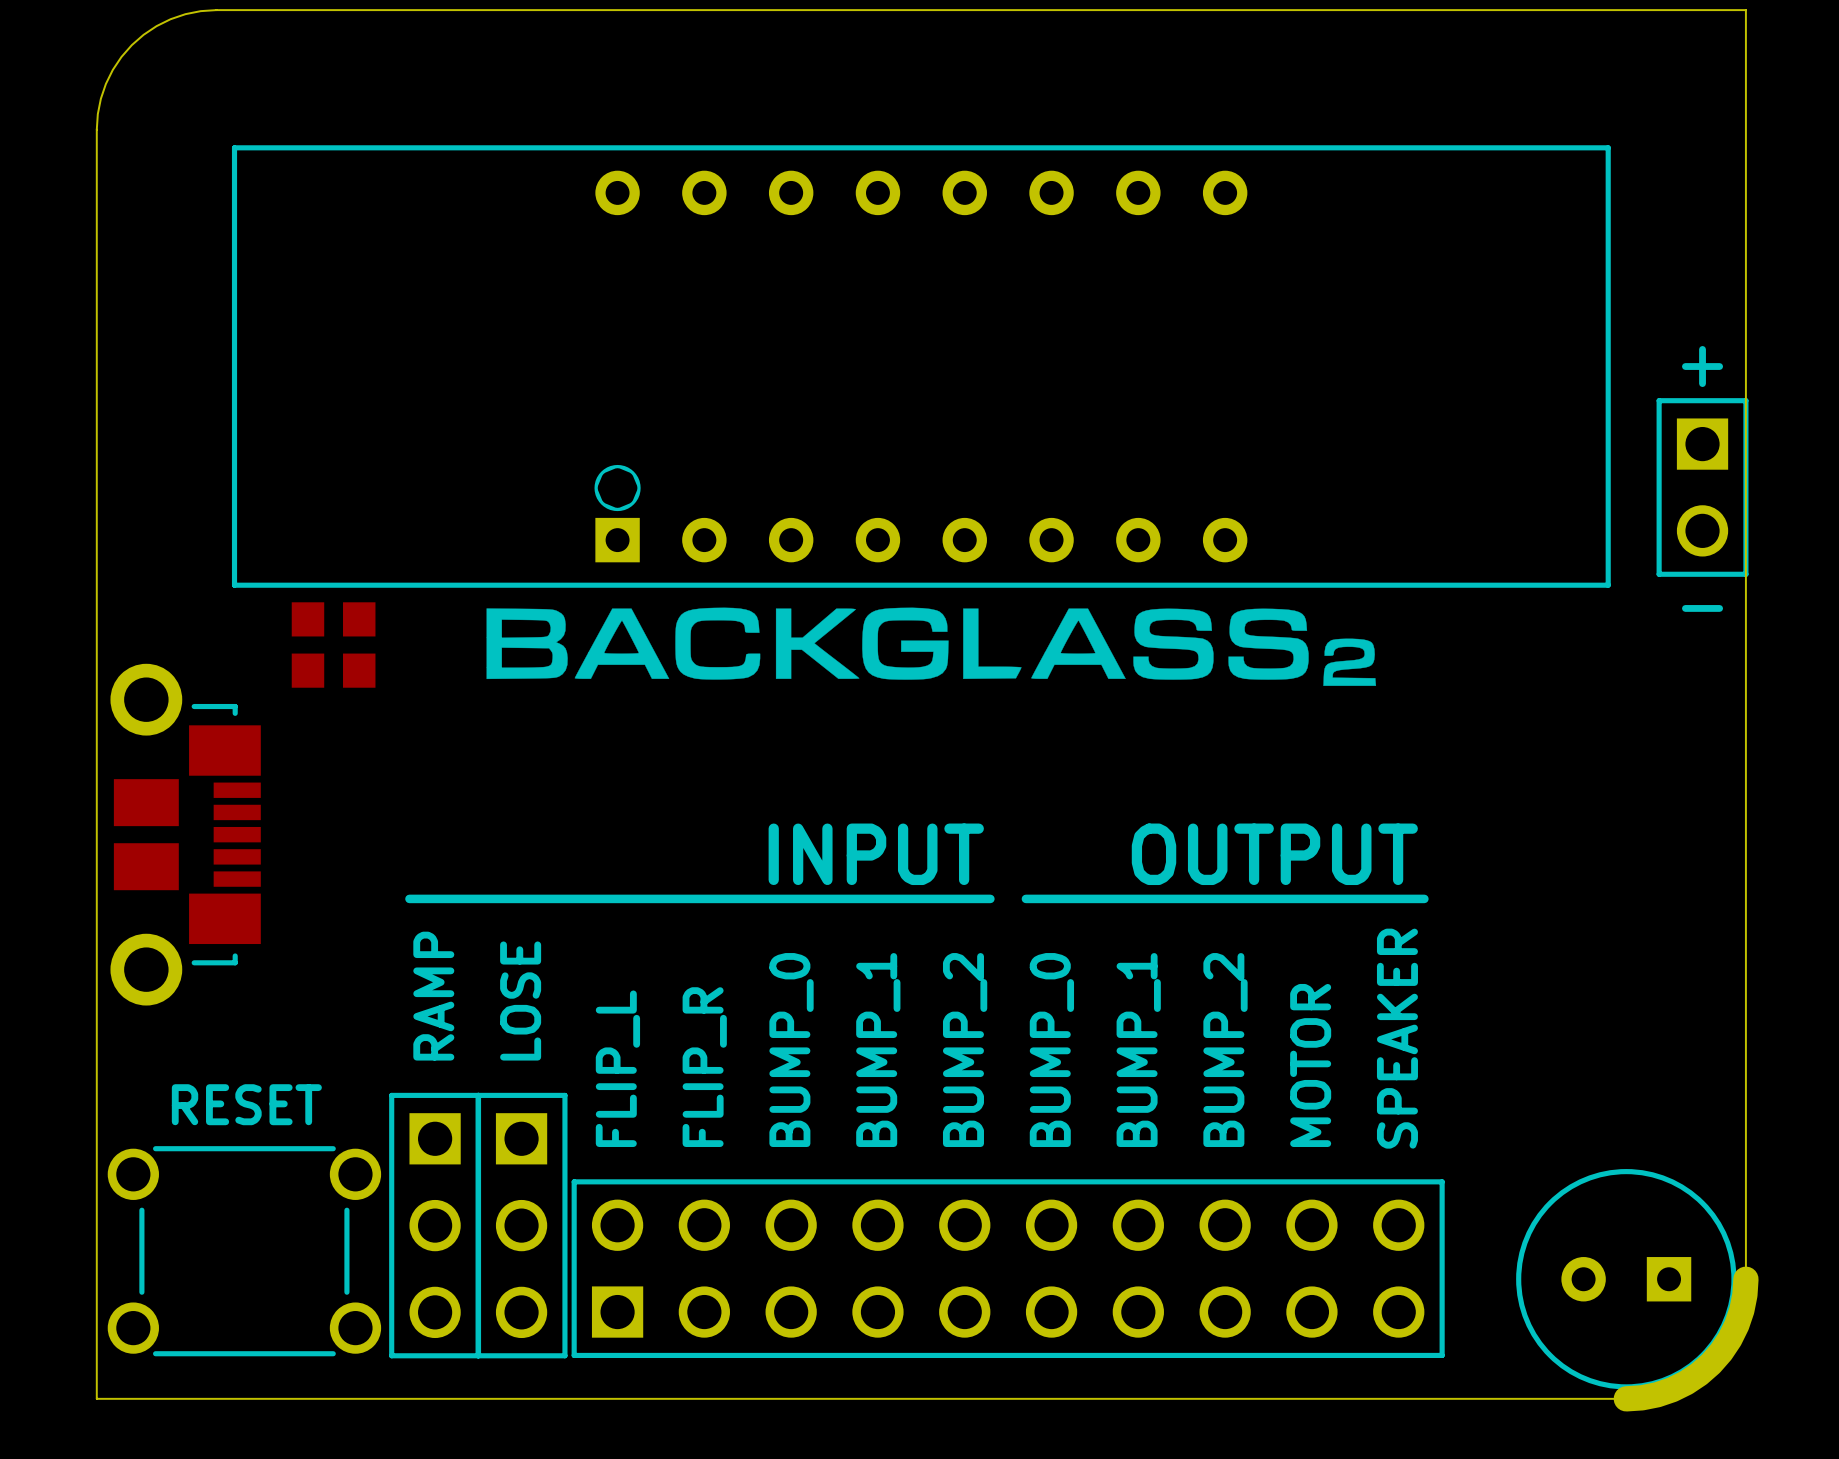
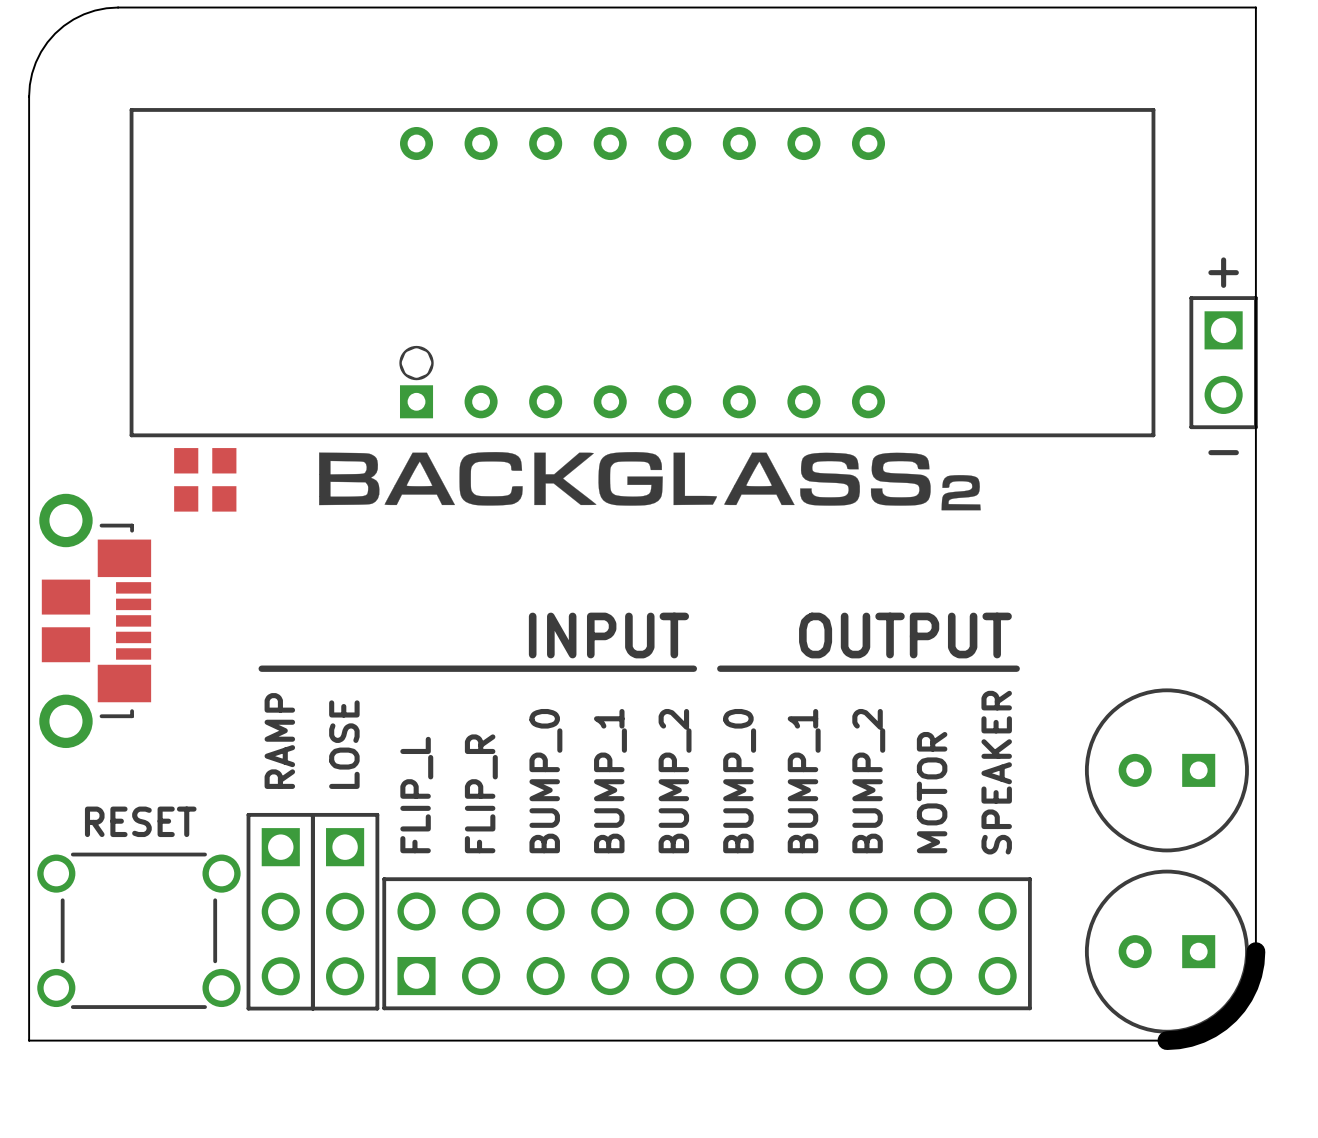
part: none -> (1166, 770)

